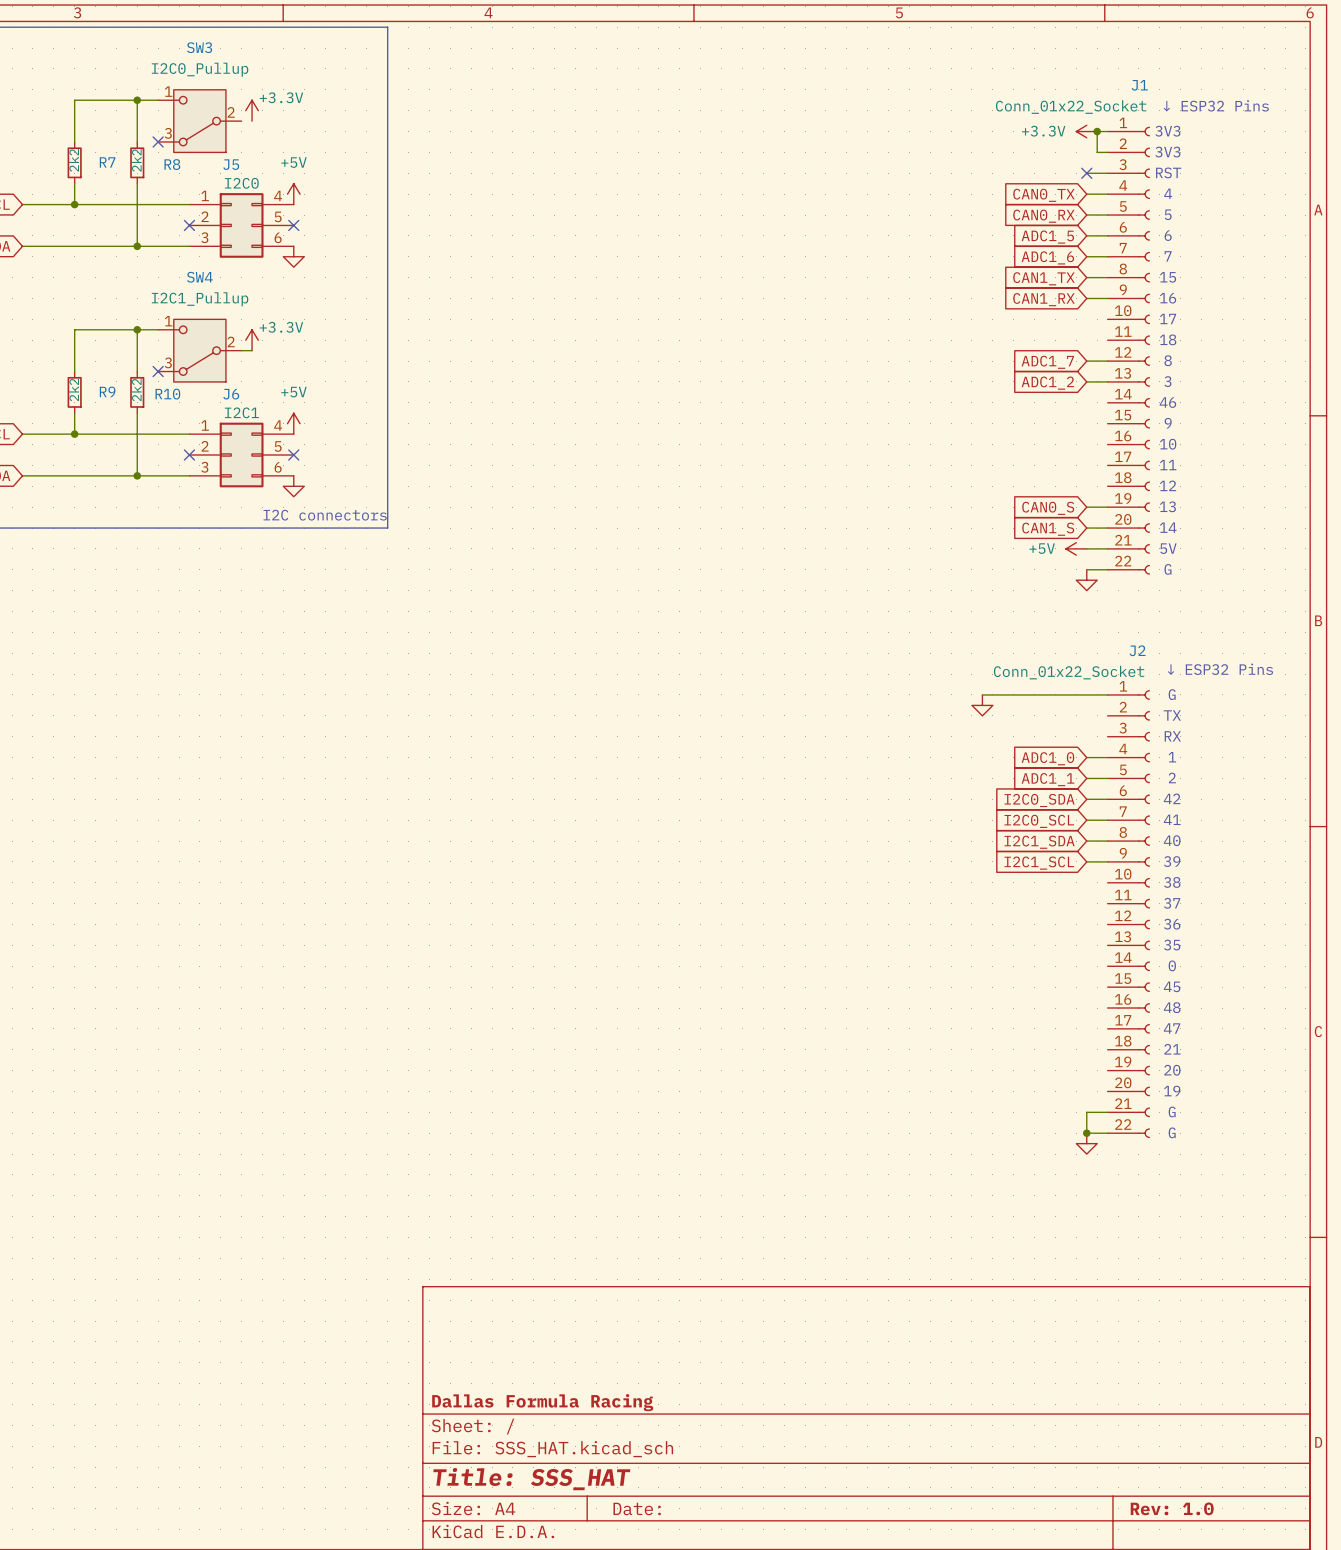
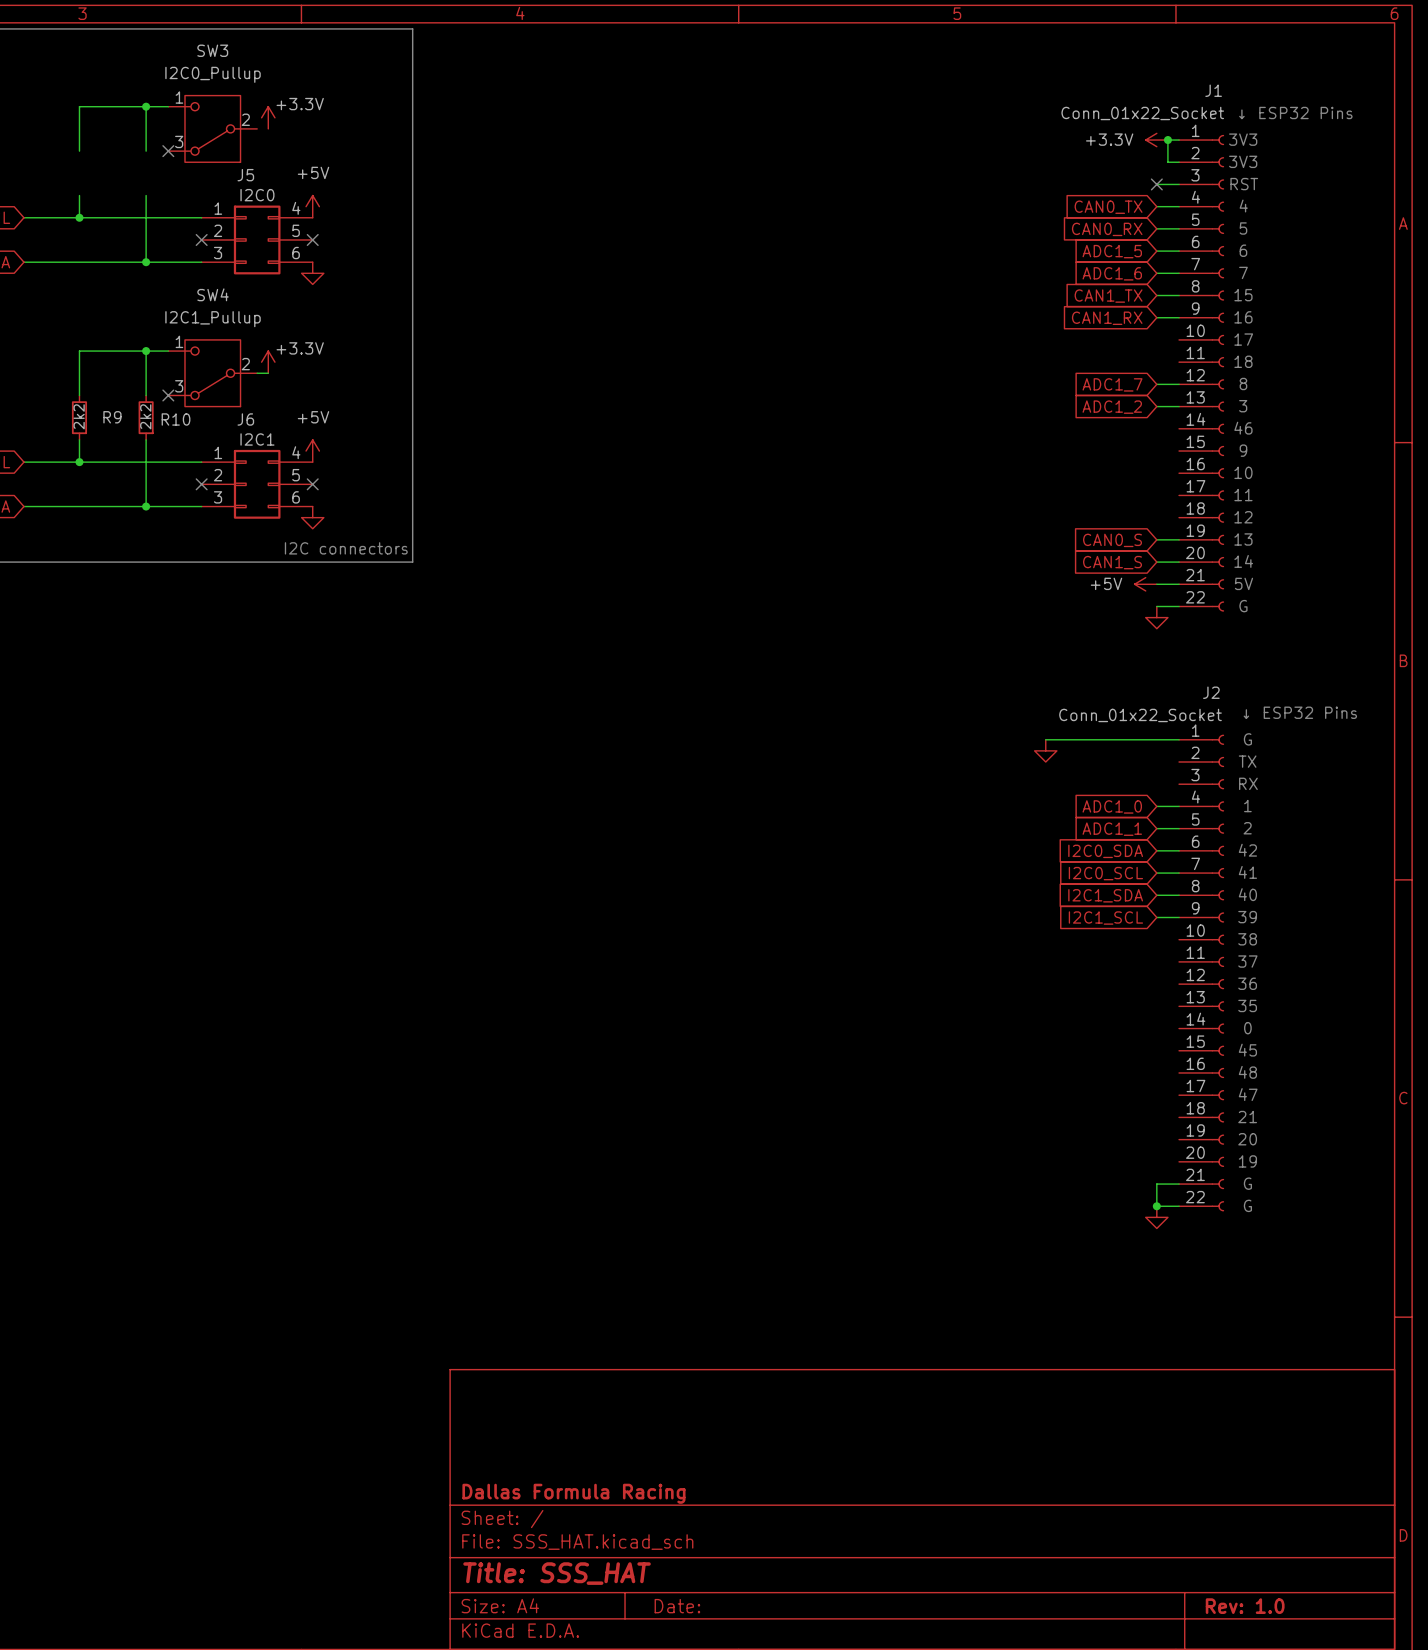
R7: 2k2 (74, 162) -> none
R8: 2k2 (137, 162) -> none

